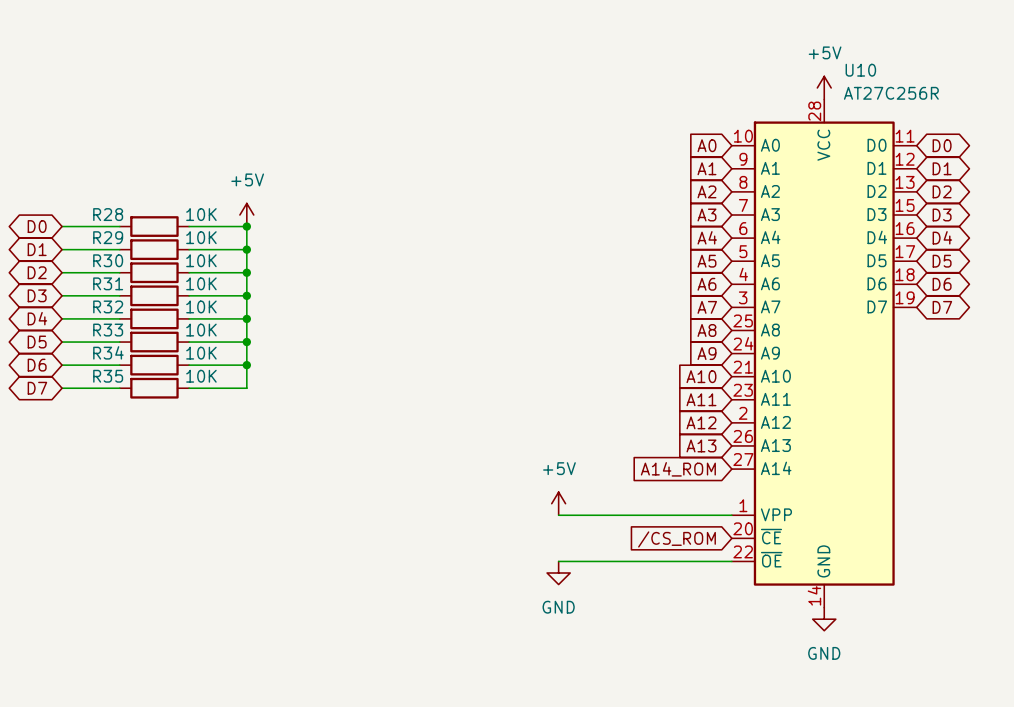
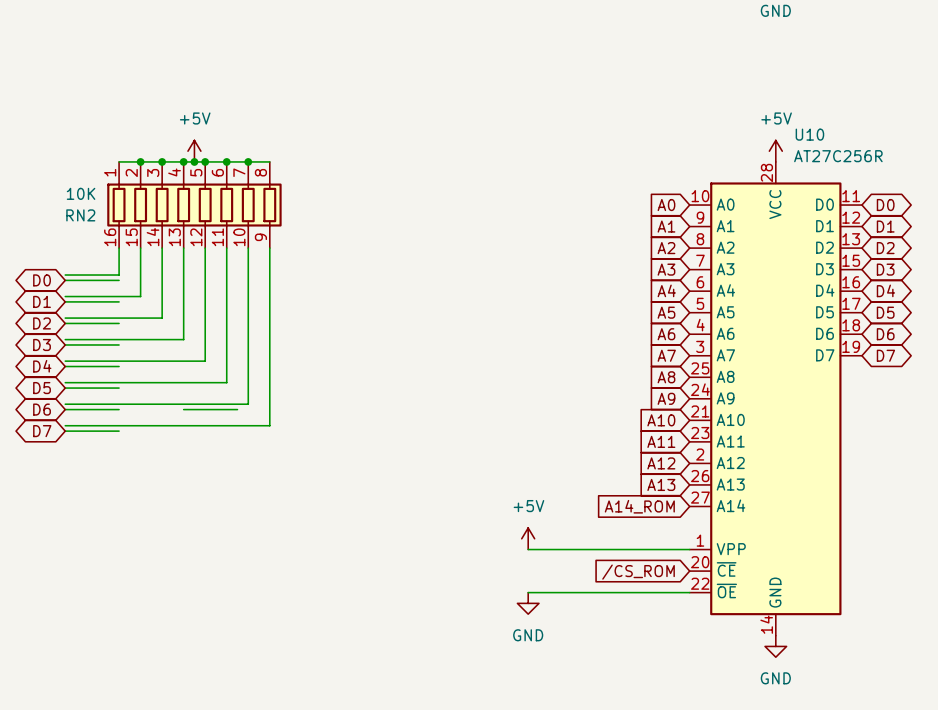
wire: none -> (119, 161) (269, 161)
junction: none -> (140, 161)
junction: none -> (162, 161)
junction: none -> (183, 161)
junction: none -> (194, 161)
junction: none -> (205, 161)
junction: none -> (226, 161)
junction: none -> (248, 161)
RN2: none -> 10K (194, 205)
wire: none -> (119, 248) (119, 275) (65, 275)
wire: none -> (140, 248) (140, 296) (65, 296)
wire: none -> (162, 248) (162, 318) (65, 318)
wire: none -> (183, 248) (183, 339) (65, 339)
wire: none -> (205, 248) (205, 361) (65, 361)
wire: none -> (226, 248) (226, 382) (65, 382)
wire: none -> (248, 248) (248, 404) (65, 404)
wire: none -> (269, 248) (269, 425) (65, 425)
power symbol position: +5V (246, 215) -> +5V (194, 151)
R28: 10K (154, 226) -> none
wire: (189, 226) (246, 226) (246, 388) (189, 388) -> none
junction: (246, 226) -> none
R29: 10K (154, 249) -> none
wire: (189, 249) (246, 249) -> none
junction: (246, 249) -> none
R30: 10K (154, 272) -> none
wire: (189, 272) (246, 272) -> none
junction: (246, 272) -> none
R31: 10K (154, 295) -> none
wire: (189, 295) (246, 295) -> none
junction: (246, 295) -> none
R32: 10K (154, 318) -> none
wire: (189, 318) (246, 318) -> none
junction: (246, 318) -> none
R33: 10K (154, 342) -> none
wire: (189, 342) (246, 342) -> none
junction: (246, 342) -> none
R34: 10K (154, 365) -> none
junction: (246, 365) -> none
R35: 10K (154, 388) -> none

